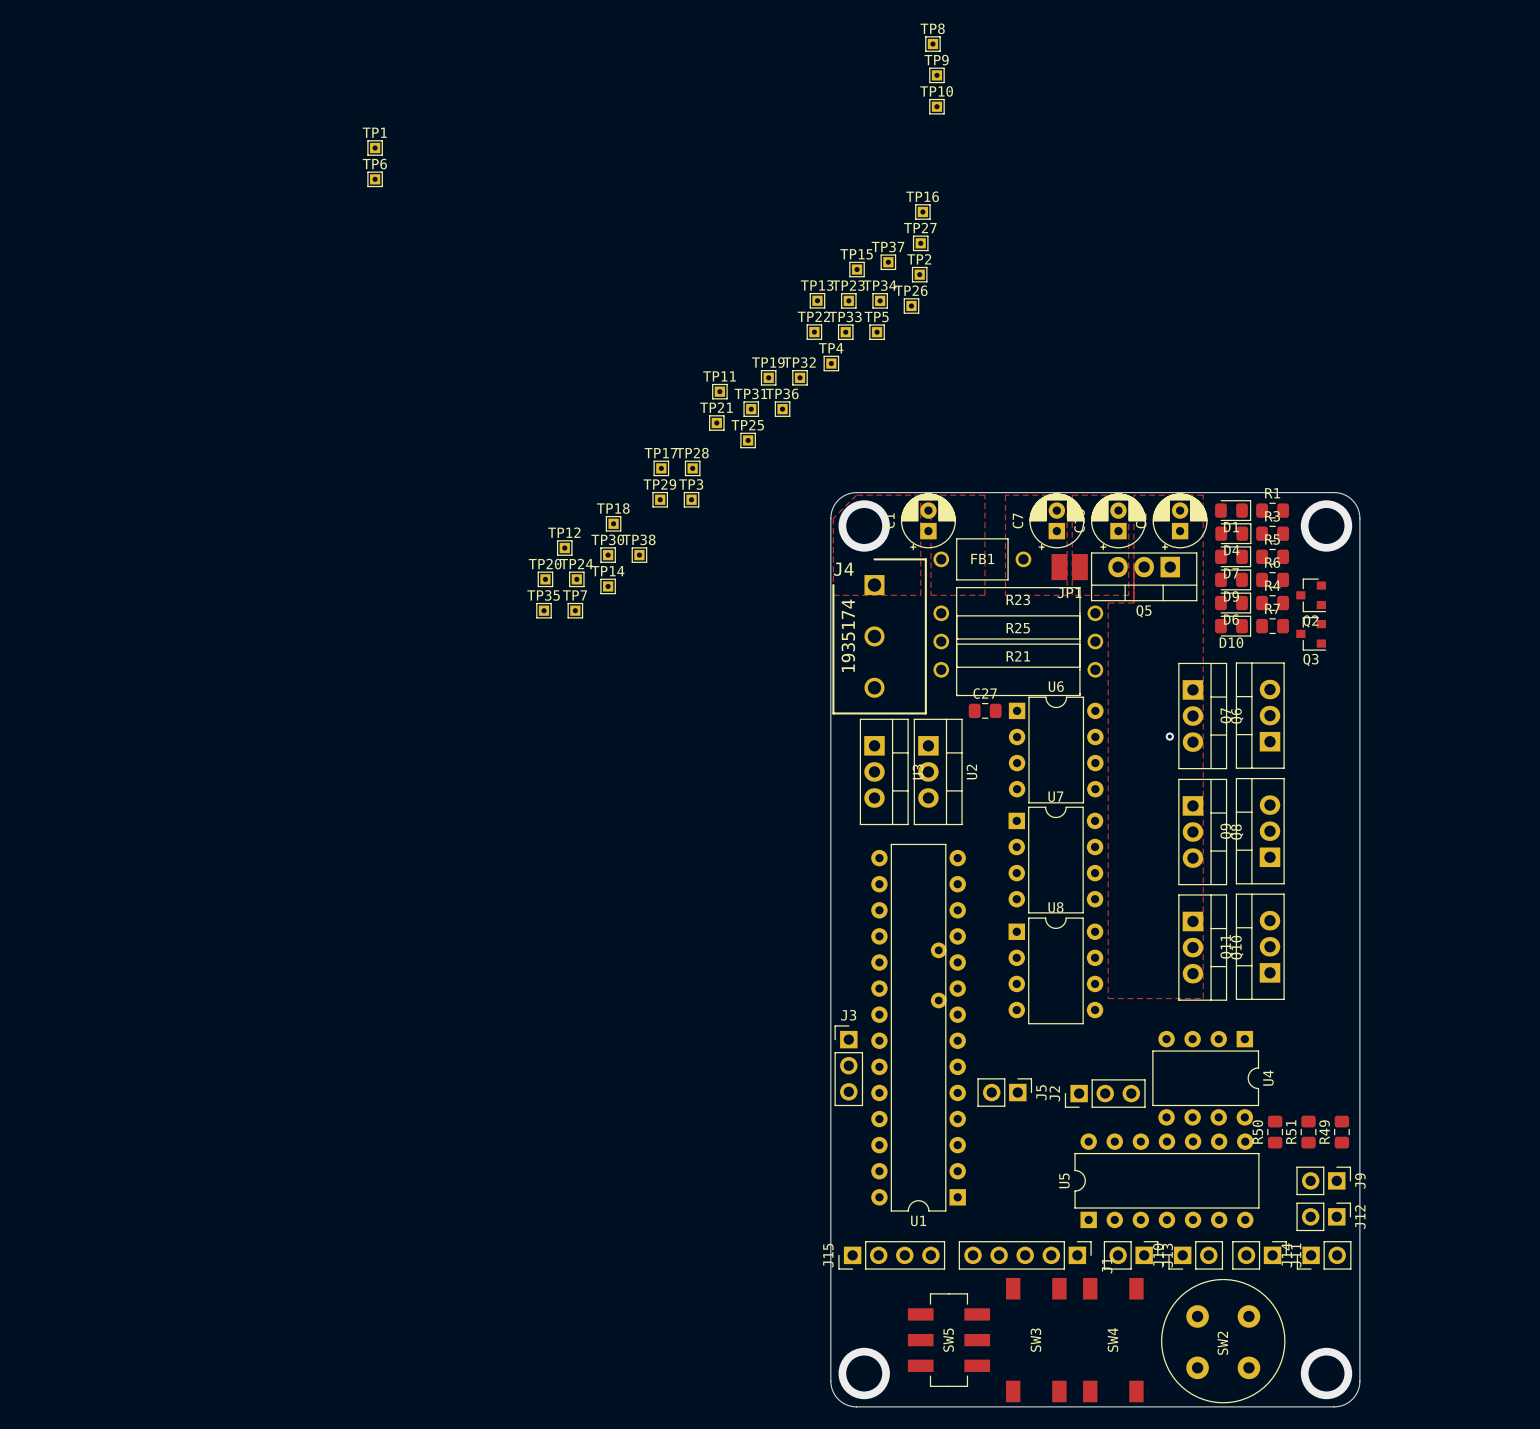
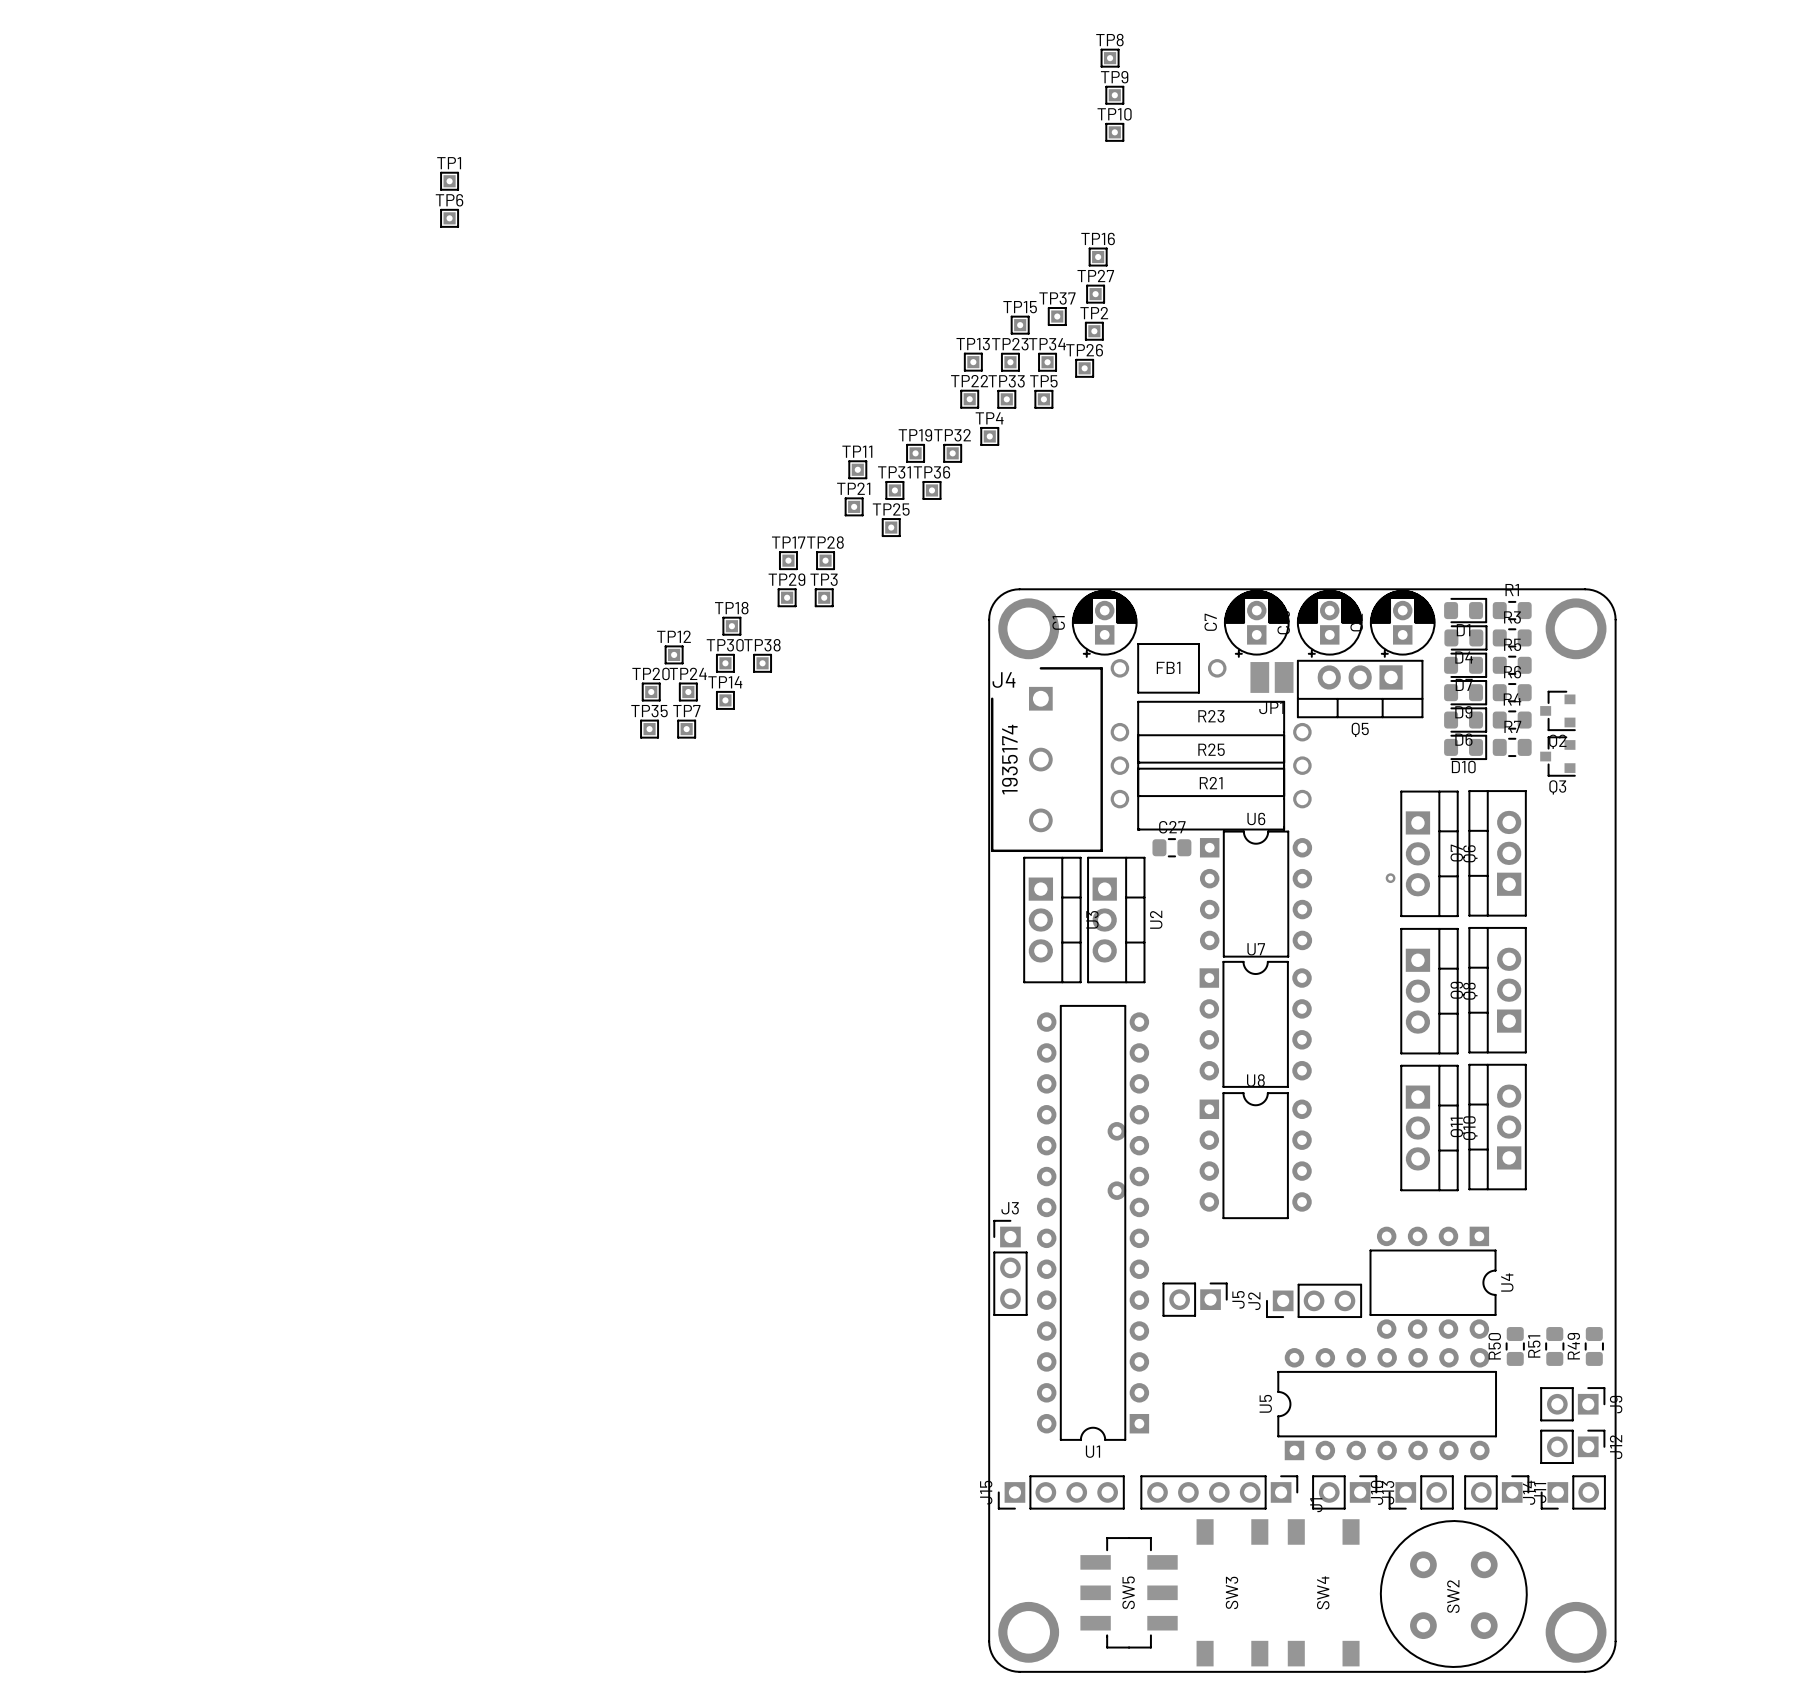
zone outline: (856, 495) (920, 495) (920, 595) (833, 595) (833, 518) (856, 495) -> none
zone outline: (930, 495) (984, 495) (984, 595) (930, 595) (930, 495) -> none
zone outline: (1005, 495) (1067, 495) (1067, 595) (1005, 595) (1005, 495) -> none
zone outline: (1072, 495) (1128, 495) (1128, 595) (1072, 595) (1072, 495) -> none
zone outline: (1133, 495) (1203, 495) (1203, 998) (1108, 998) (1108, 603) (1133, 603) (1133, 495) -> none

